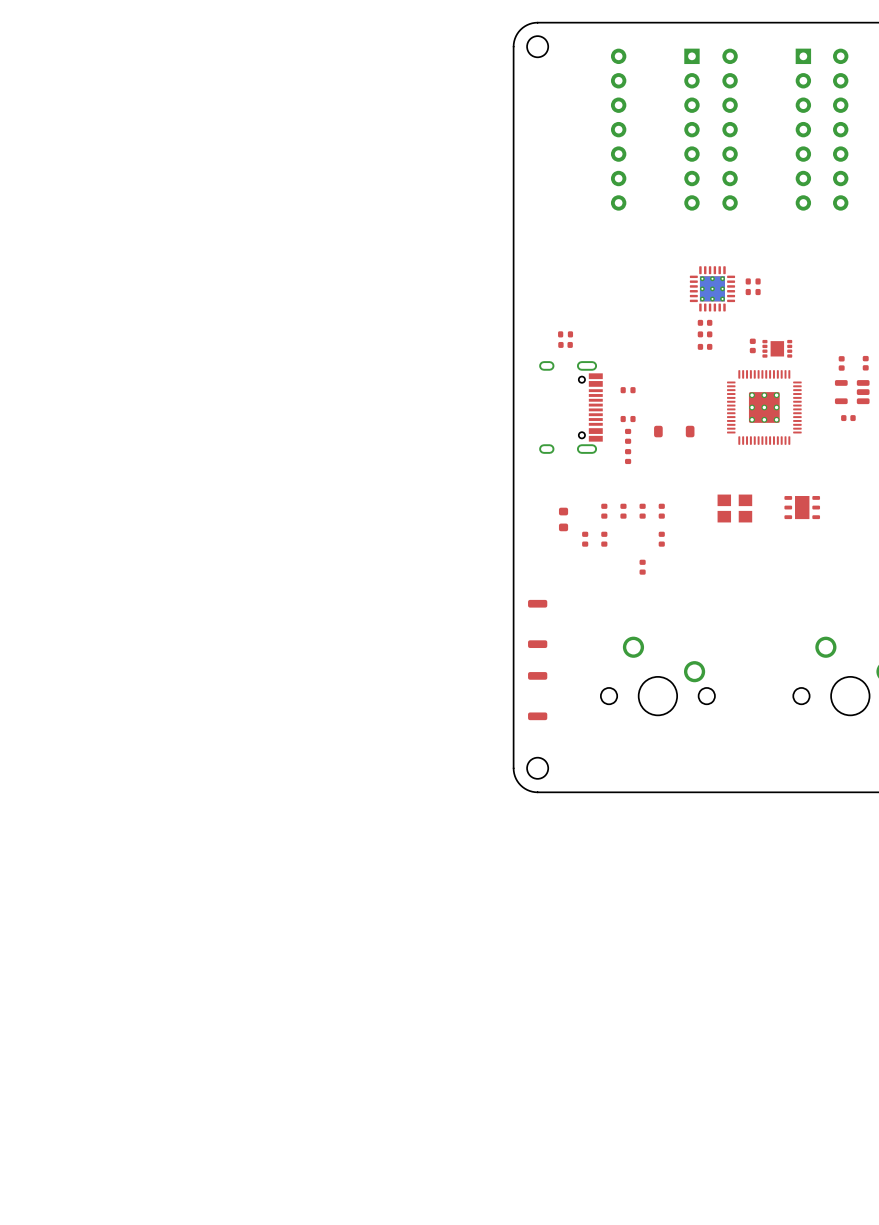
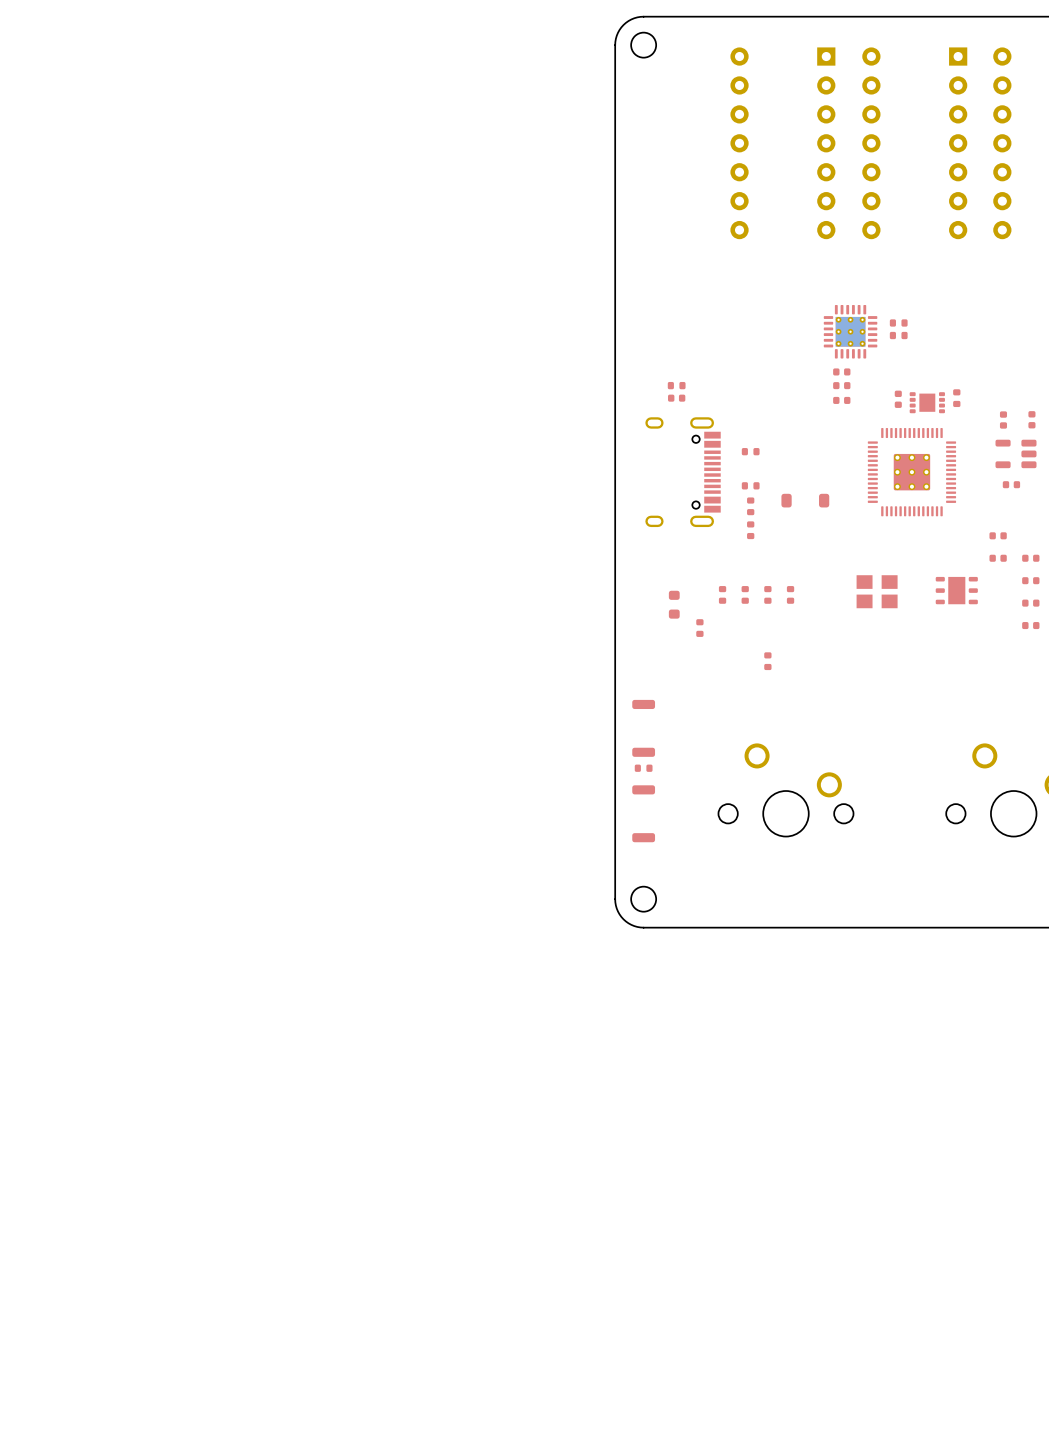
part: none -> (956, 398)
part: none -> (998, 535)
part: none -> (998, 558)
part: none -> (1030, 558)
part: none -> (1030, 580)
part: none -> (1030, 603)
part: none -> (1030, 625)
part: (604, 539) -> none
part: (661, 539) -> none
part: none -> (643, 768)

